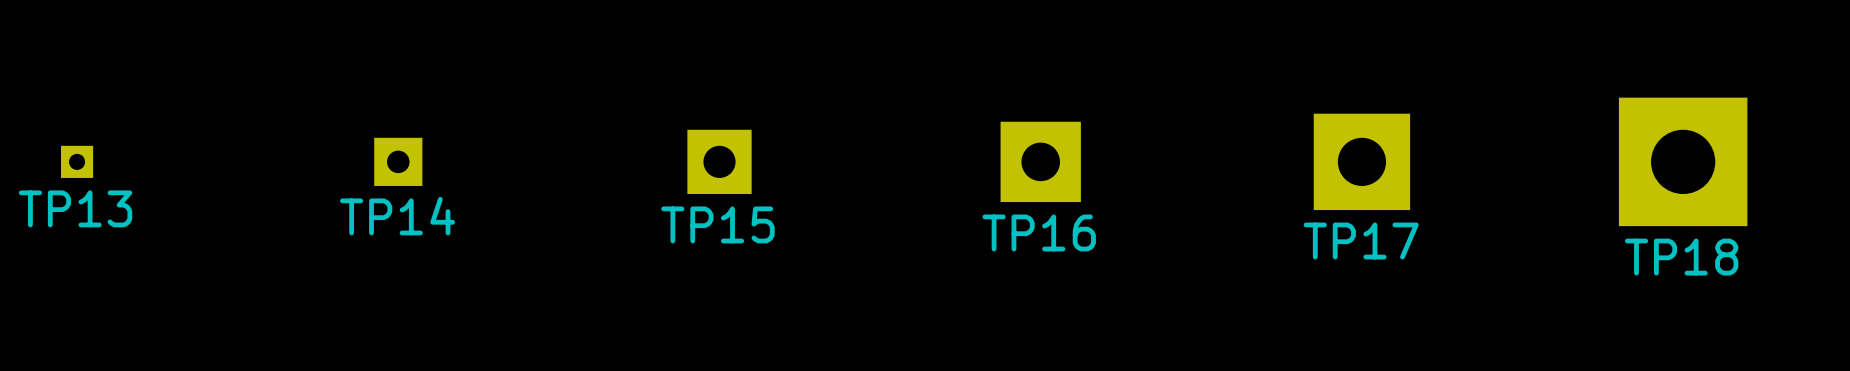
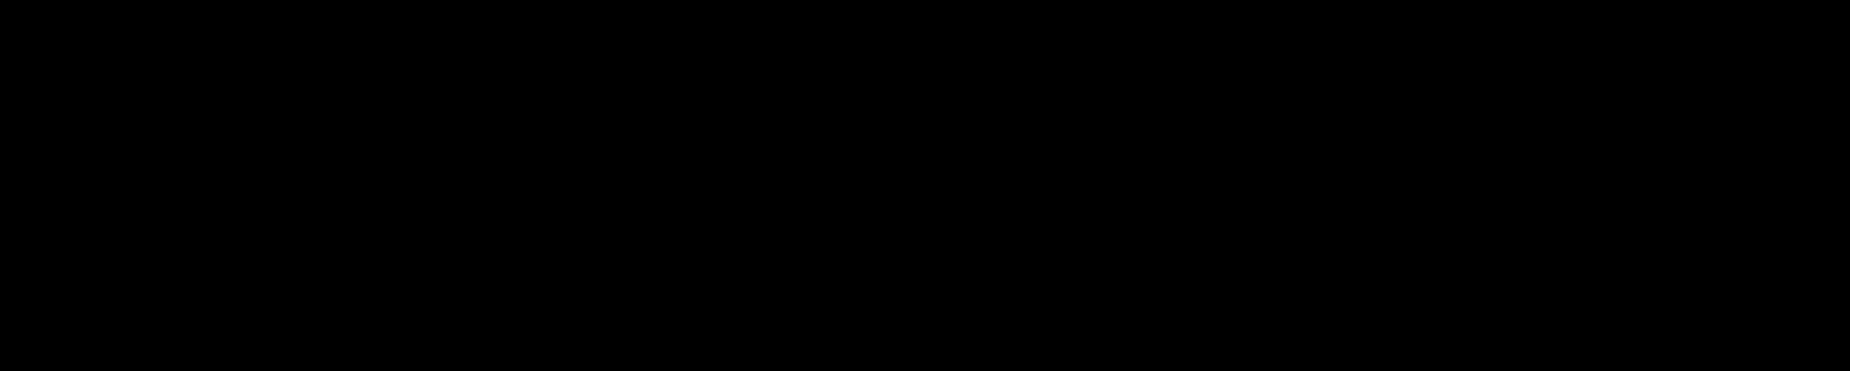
TP13: (77, 161) -> none
TP14: (398, 161) -> none
TP15: (719, 161) -> none
TP16: (1040, 161) -> none
TP17: (1361, 161) -> none
TP18: (1683, 161) -> none

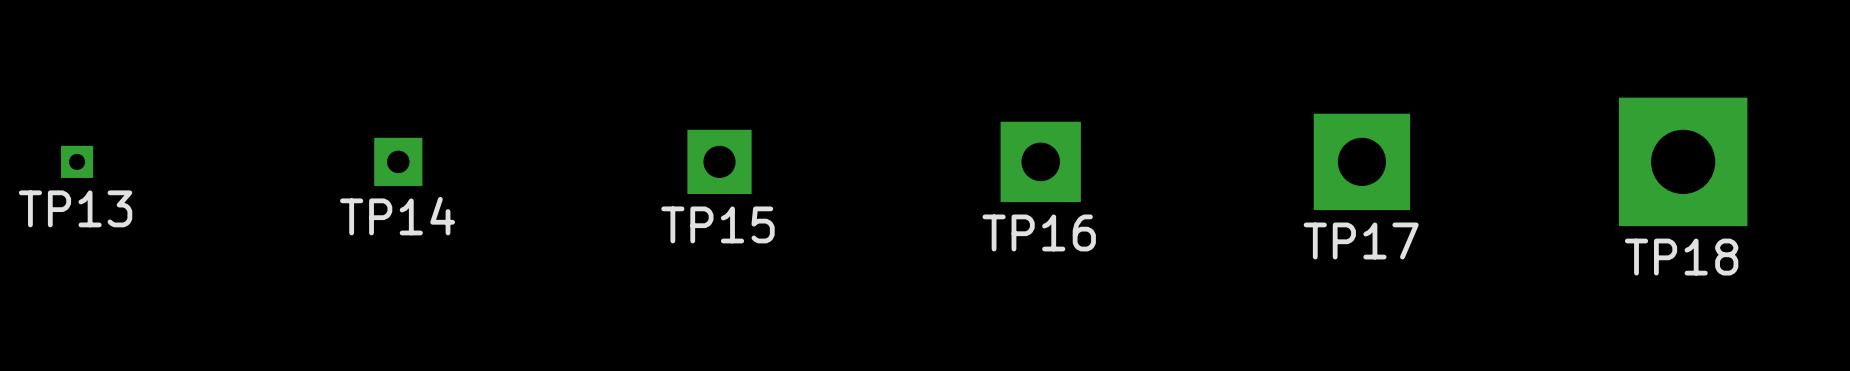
TP13: none -> (77, 161)
TP14: none -> (398, 161)
TP15: none -> (719, 161)
TP16: none -> (1040, 161)
TP17: none -> (1361, 161)
TP18: none -> (1683, 161)

